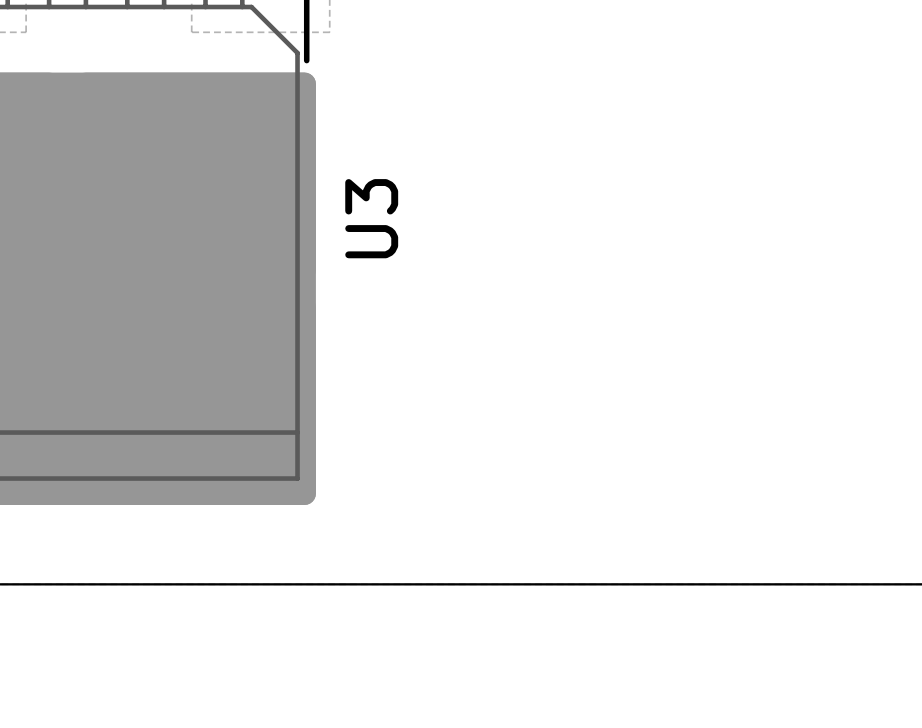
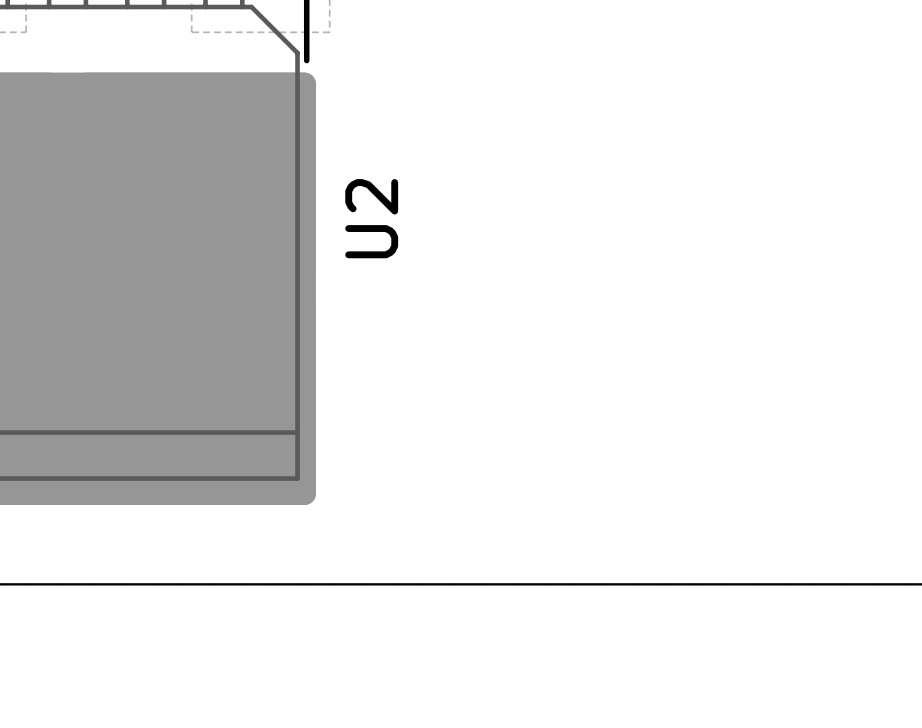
U3 name: U3 (371, 218) -> U2 (371, 218)

